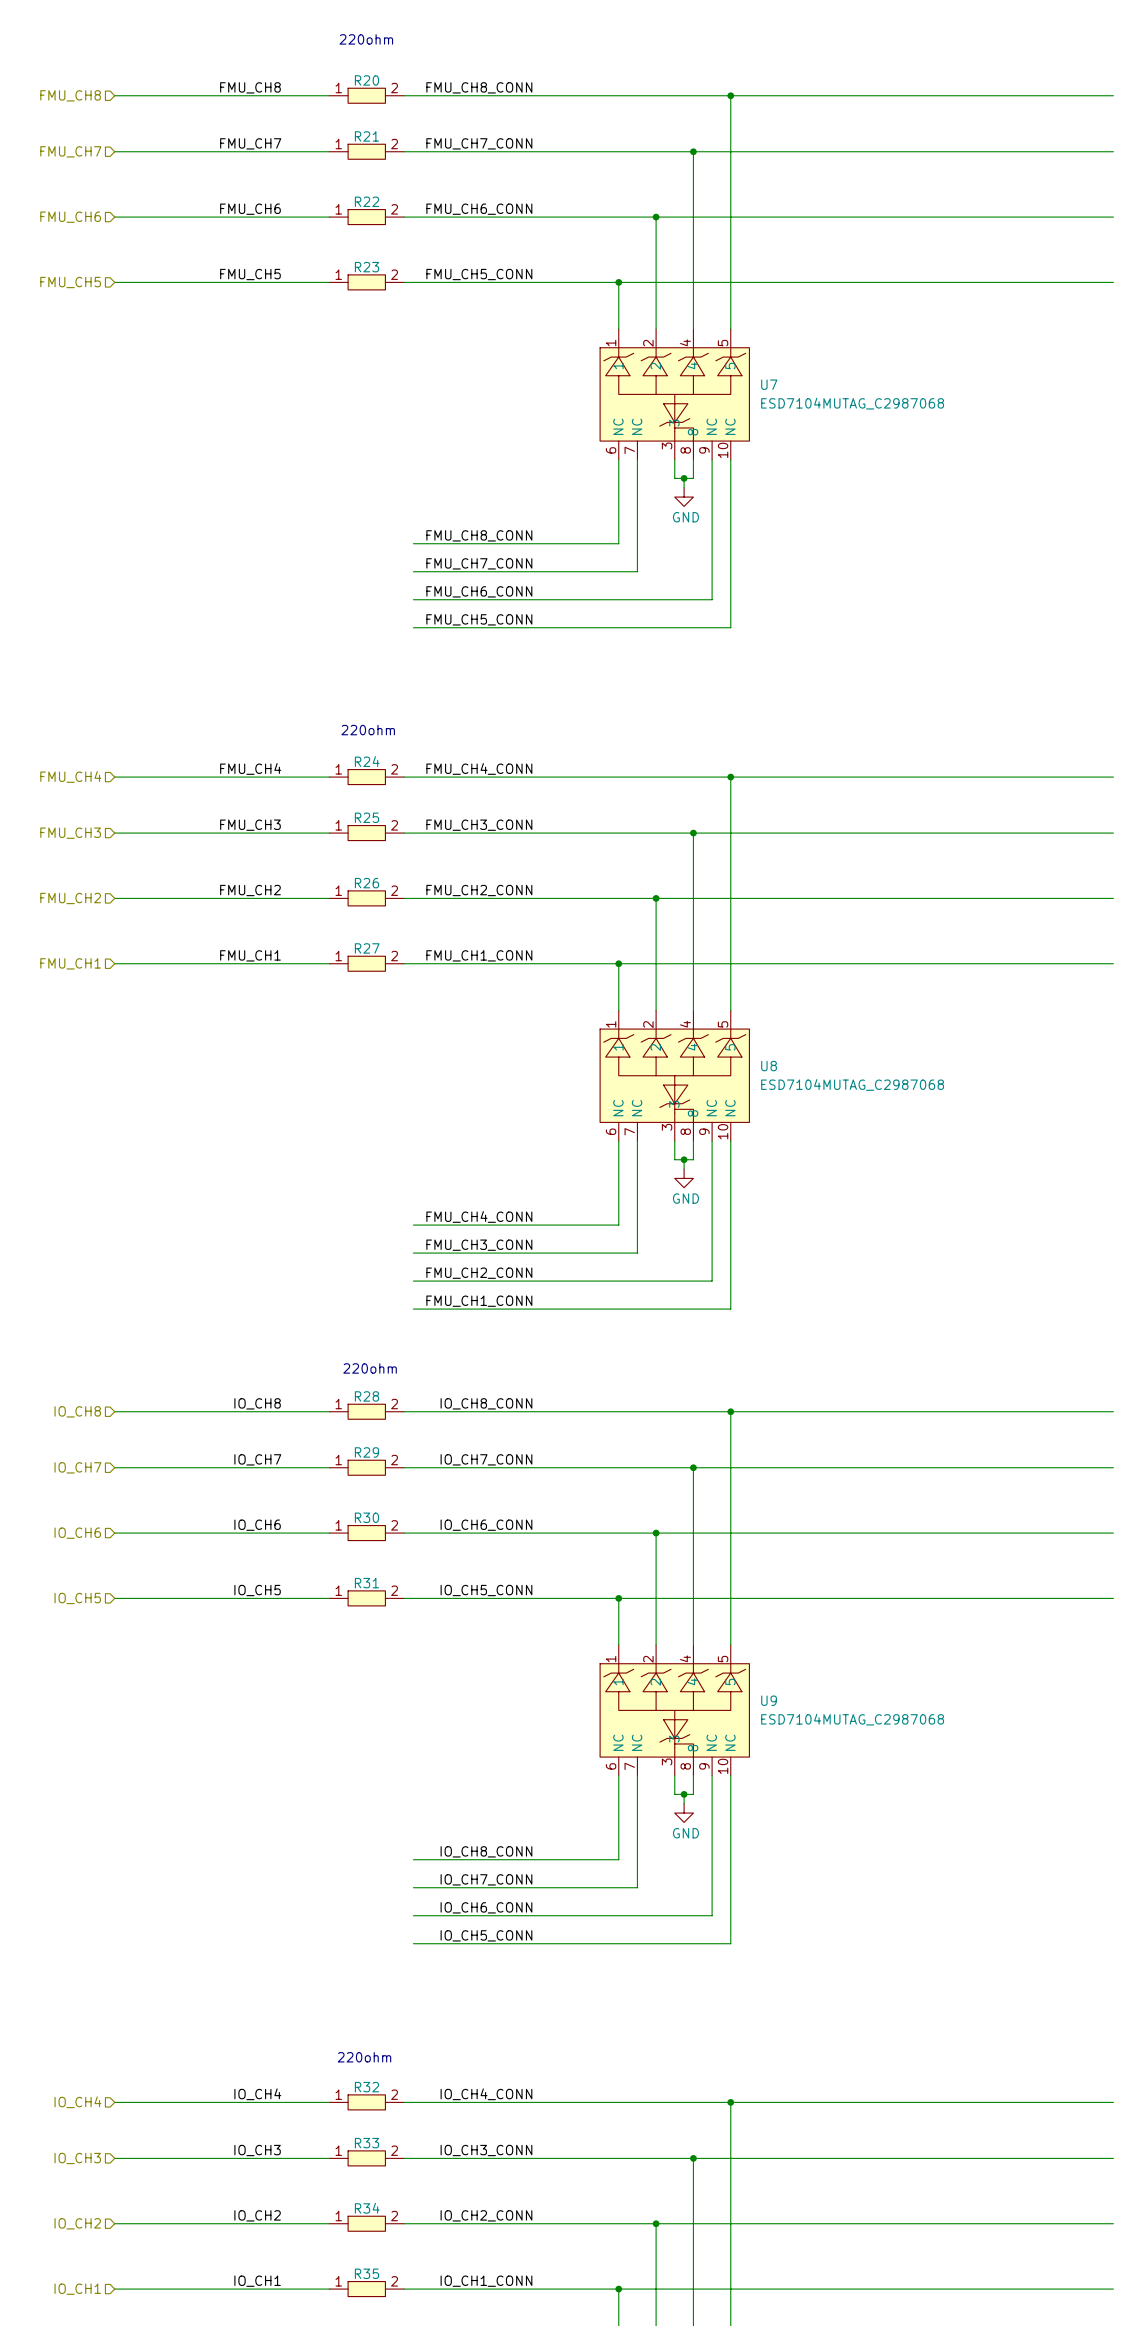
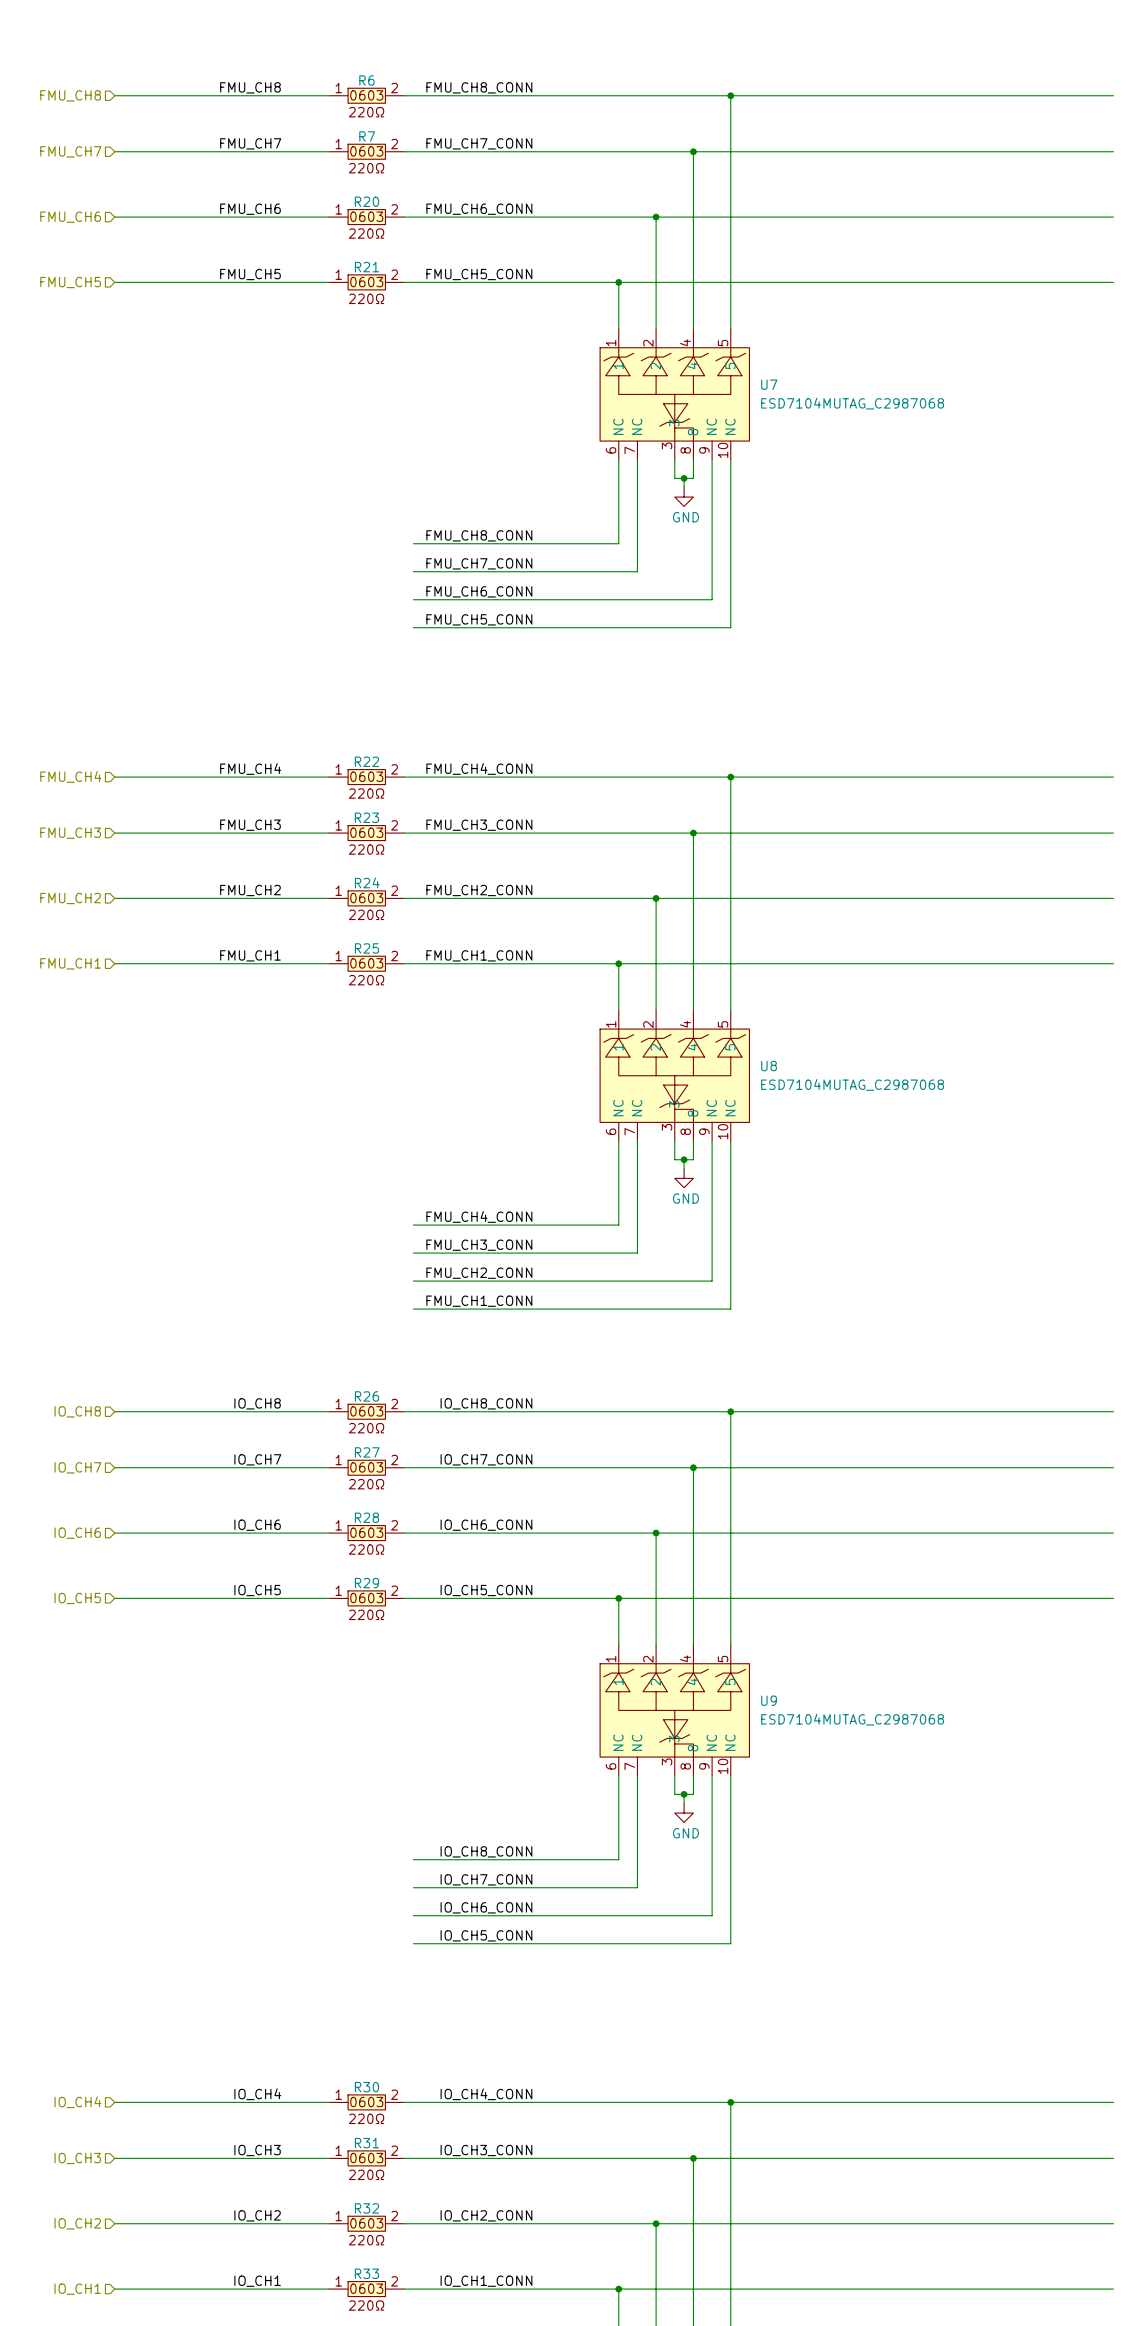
text: 220ohm (366, 39) -> none
R20 position: (366, 95) -> (366, 217)
R6: none -> (366, 95)
R21 position: (366, 151) -> (366, 282)
R7: none -> (366, 151)
R20 text: none -> 0603 (366, 216)
R22 position: (366, 217) -> (366, 777)
R20 text: none -> 220Ω (366, 233)
R21 text: none -> 0603 (366, 282)
R23 position: (366, 282) -> (366, 833)
R21 text: none -> 220Ω (366, 298)
text: 220ohm (368, 730) -> none
R22 text: none -> 0603 (366, 776)
R24 position: (366, 777) -> (366, 898)
R22 text: none -> 220Ω (366, 793)
R23 text: none -> 0603 (366, 832)
R25 position: (366, 833) -> (366, 963)
R23 text: none -> 220Ω (366, 849)
R26 position: (366, 898) -> (366, 1411)
R24 text: none -> 0603 (366, 898)
R24 text: none -> 220Ω (366, 914)
R27 position: (366, 963) -> (366, 1467)
R25 text: none -> 0603 (366, 963)
R25 text: none -> 220Ω (366, 980)
text: 220ohm (370, 1368) -> none
R26 text: none -> 0603 (366, 1411)
R28 position: (366, 1411) -> (366, 1533)
R26 text: none -> 220Ω (366, 1428)
R29 position: (366, 1467) -> (366, 1598)
R27 text: none -> 0603 (366, 1467)
R27 text: none -> 220Ω (366, 1484)
R28 text: none -> 0603 (366, 1532)
R30 position: (366, 1533) -> (366, 2102)
R28 text: none -> 220Ω (366, 1549)
R29 text: none -> 0603 (366, 1598)
R31 position: (366, 1598) -> (366, 2158)
R29 text: none -> 220Ω (366, 1614)
text: 220ohm (364, 2057) -> none
R32 position: (366, 2102) -> (366, 2223)
R30 text: none -> 0603 (366, 2102)
R30 text: none -> 220Ω (366, 2118)
R33 position: (366, 2158) -> (366, 2289)
R31 text: none -> 0603 (366, 2158)
R31 text: none -> 220Ω (366, 2174)
R32 text: none -> 0603 (366, 2223)
R34: (366, 2223) -> none
R32 text: none -> 220Ω (366, 2240)
R33 text: none -> 0603 (366, 2288)
R35: (366, 2289) -> none
R33 text: none -> 220Ω (366, 2305)

